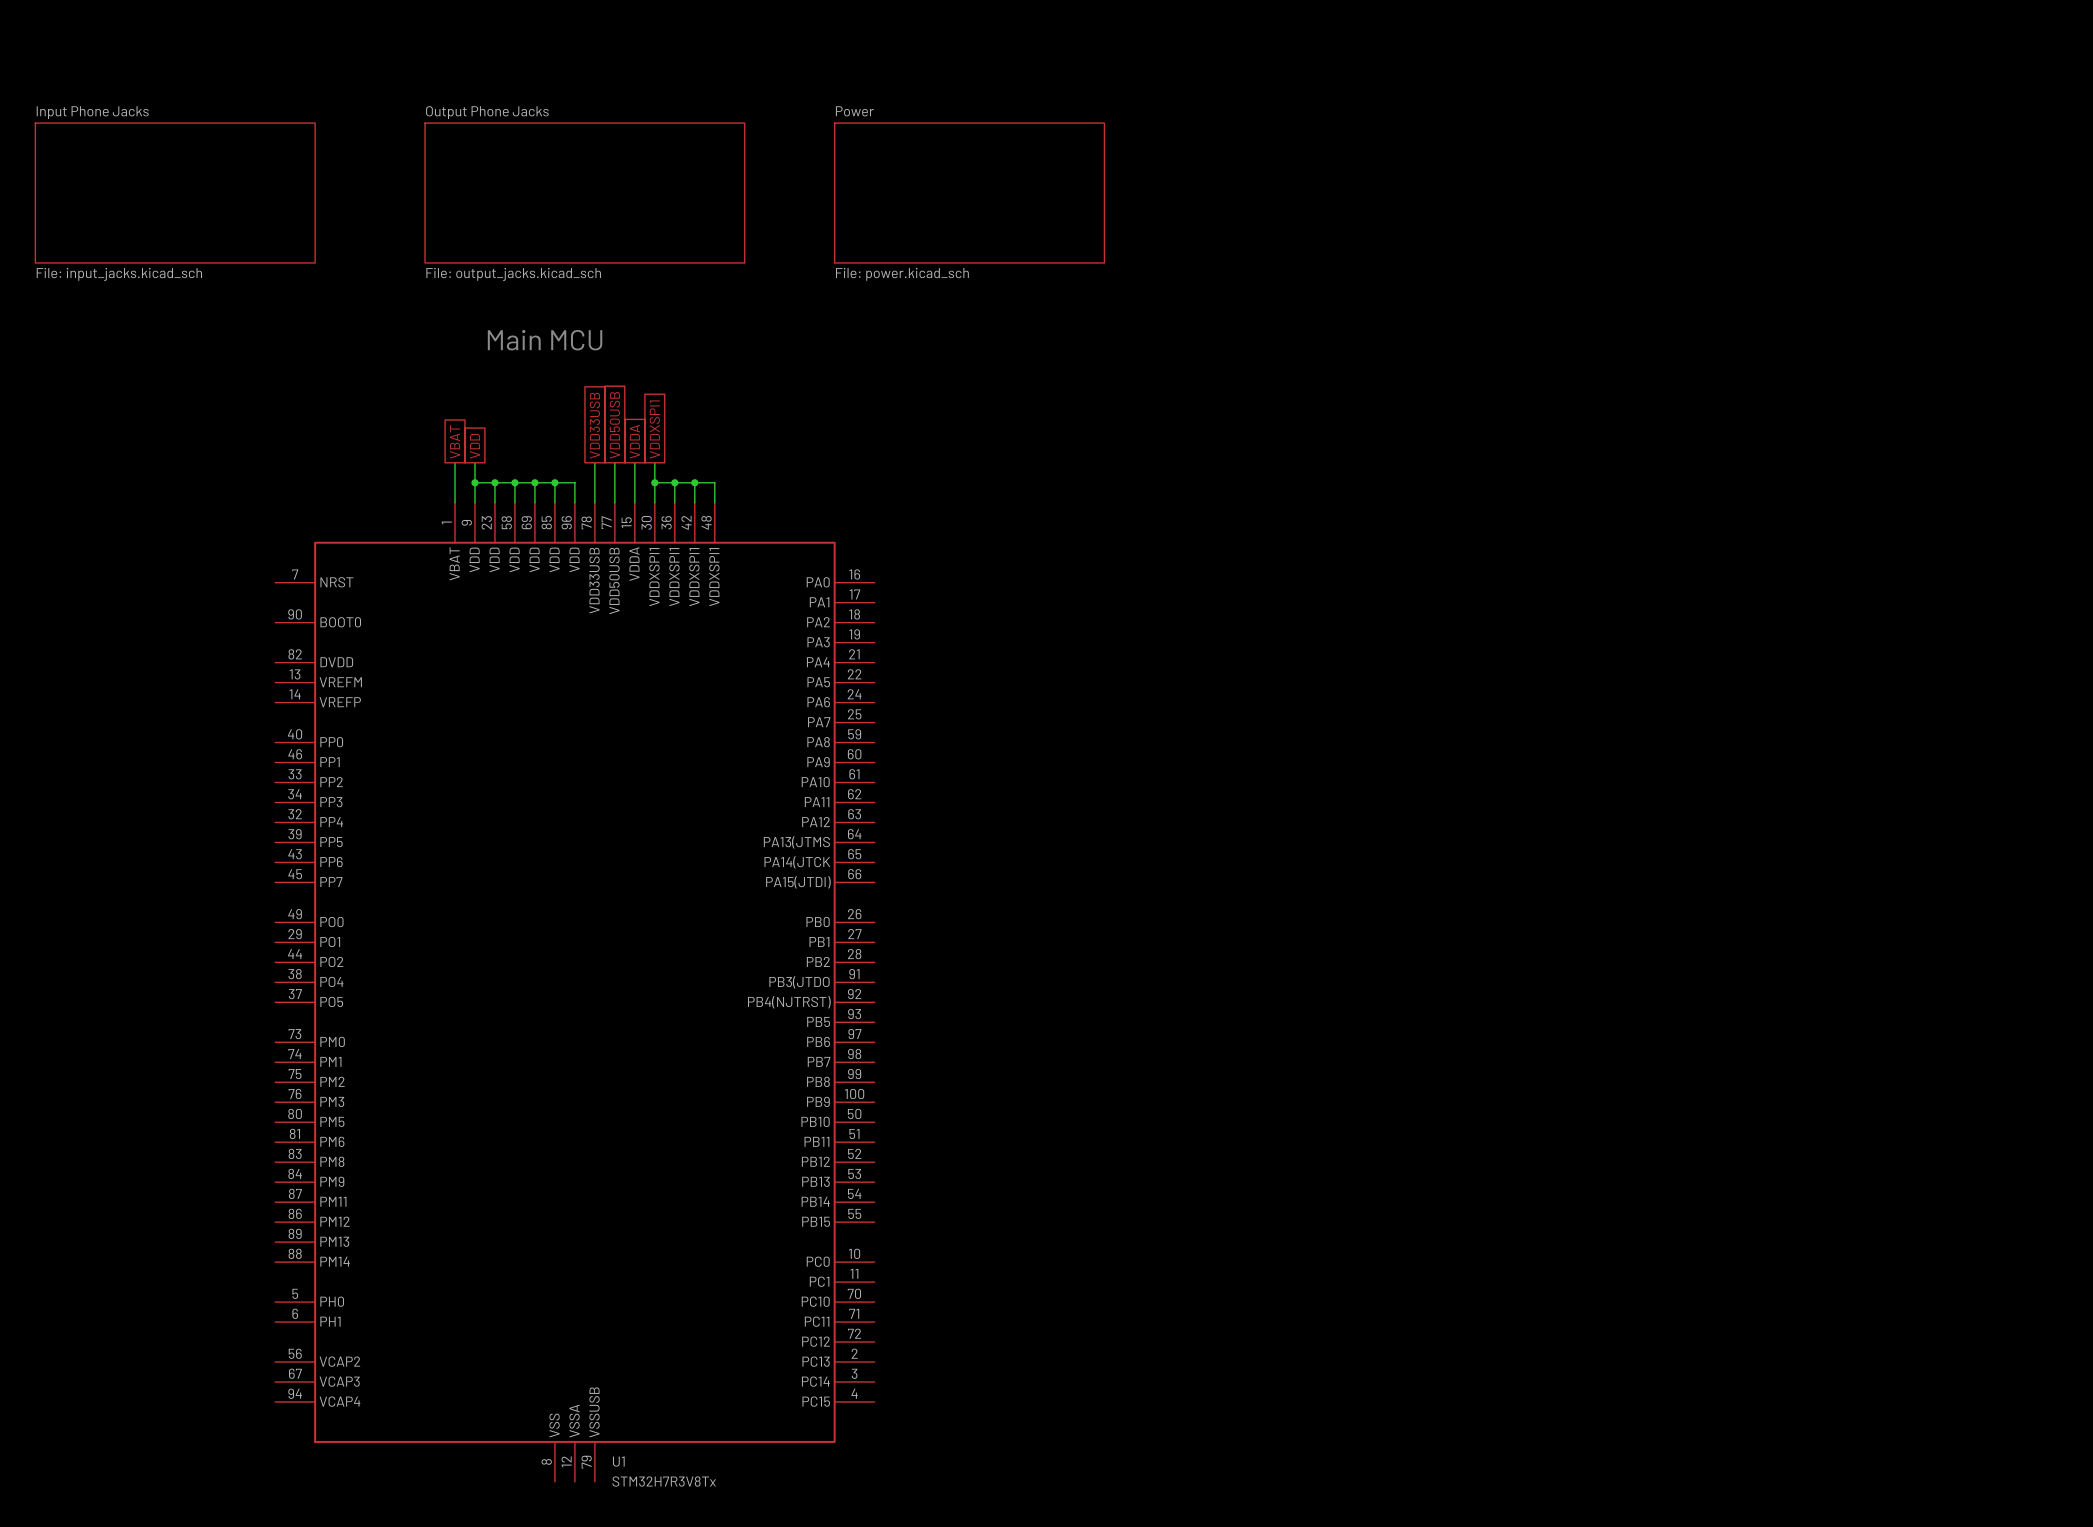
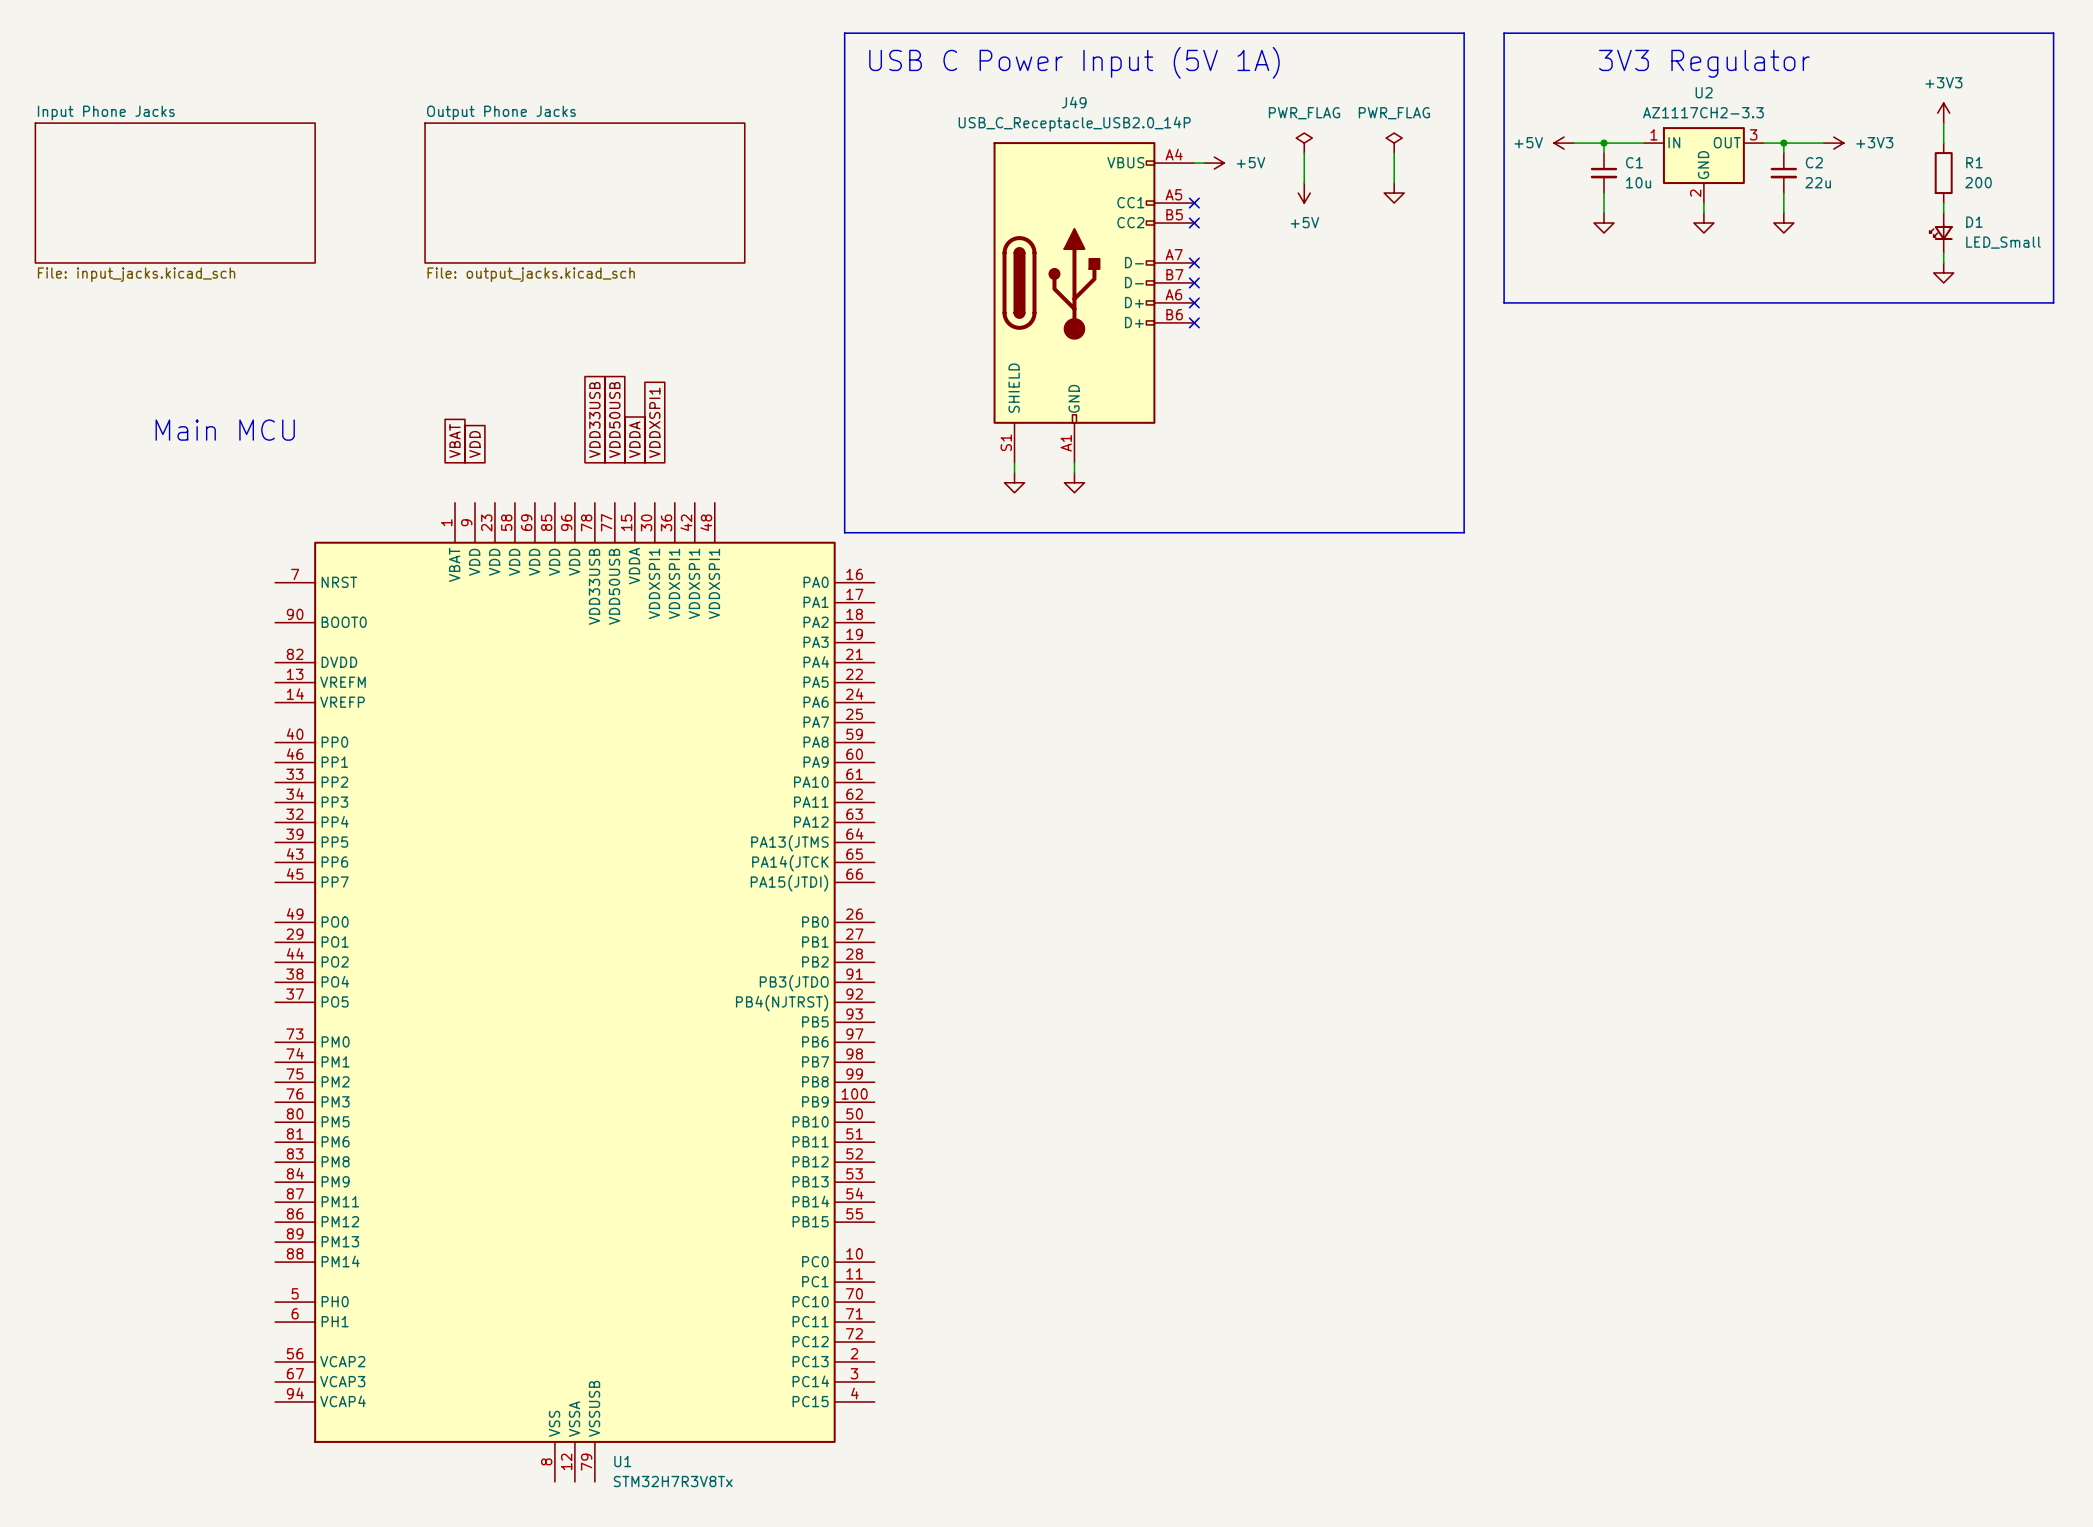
line: none -> (844, 33) (1464, 33) (1464, 532) (844, 532) (844, 33)
line: none -> (1504, 33) (2053, 33) (2053, 302) (1504, 302) (1504, 33)
text: none -> USB C Power Input (5V 1A) (1074, 62)
text: none -> 3V3 Regulator (1704, 63)
power symbol: none -> +3V3 (1943, 113)
wire: none -> (1943, 123) (1943, 143)
power symbol: none -> PWR_FLAG (1304, 143)
power symbol: none -> PWR_FLAG (1394, 143)
power symbol: none -> +5V (1564, 143)
wire: none -> (1574, 143) (1643, 143)
wire: none -> (1603, 143) (1603, 153)
junction: none -> (1603, 143)
wire: none -> (1763, 143) (1823, 143)
wire: none -> (1783, 143) (1783, 153)
junction: none -> (1783, 143)
power symbol: none -> +3V3 (1833, 143)
wire: none -> (1304, 153) (1304, 183)
wire: none -> (1394, 153) (1394, 183)
wire: none -> (1194, 163) (1204, 163)
power symbol: none -> +5V (1214, 163)
U2: none -> AZ1117CH2-3.3 (1703, 165)
C1: none -> 10u (1603, 173)
C2: none -> 22u (1783, 173)
R1: none -> 200 (1943, 173)
sheet Power: File: power.kicad_sch (969, 193) -> none
power symbol: none -> +5V (1304, 193)
power symbol: none -> (1394, 193)
wire: none -> (1603, 193) (1603, 213)
wire: none -> (1783, 193) (1783, 213)
no-connect mark: none -> (1194, 203)
wire: none -> (1703, 203) (1703, 213)
wire: none -> (1943, 203) (1943, 213)
no-connect mark: none -> (1194, 223)
power symbol: none -> (1603, 223)
power symbol: none -> (1703, 223)
power symbol: none -> (1783, 223)
D1: none -> LED_Small (1941, 233)
wire: none -> (1943, 252) (1943, 262)
no-connect mark: none -> (1194, 262)
power symbol: none -> (1943, 272)
no-connect mark: none -> (1194, 282)
J49: none -> USB_C_Receptacle_USB2.0_14P (1093, 302)
no-connect mark: none -> (1194, 302)
no-connect mark: none -> (1194, 322)
text: Main MCU (545, 340) -> none
text: none -> Main MCU (225, 430)
wire: (455, 462) (455, 502) -> none
wire: (474, 462) (474, 502) -> none
wire: (594, 462) (594, 502) -> none
wire: (614, 462) (614, 502) -> none
wire: (634, 462) (634, 502) -> none
wire: (654, 462) (654, 502) -> none
wire: none -> (1014, 462) (1014, 472)
wire: none -> (1074, 462) (1074, 472)
wire: (474, 482) (574, 482) (574, 502) -> none
junction: (474, 482) -> none
wire: (494, 482) (494, 502) -> none
junction: (494, 482) -> none
wire: (514, 482) (514, 502) -> none
junction: (514, 482) -> none
wire: (534, 482) (534, 502) -> none
junction: (534, 482) -> none
wire: (554, 482) (554, 502) -> none
junction: (554, 482) -> none
wire: (654, 482) (714, 482) (714, 502) -> none
junction: (654, 482) -> none
wire: (674, 482) (674, 502) -> none
junction: (674, 482) -> none
wire: (694, 482) (694, 502) -> none
junction: (694, 482) -> none
power symbol: none -> (1014, 482)
power symbol: none -> (1074, 482)

